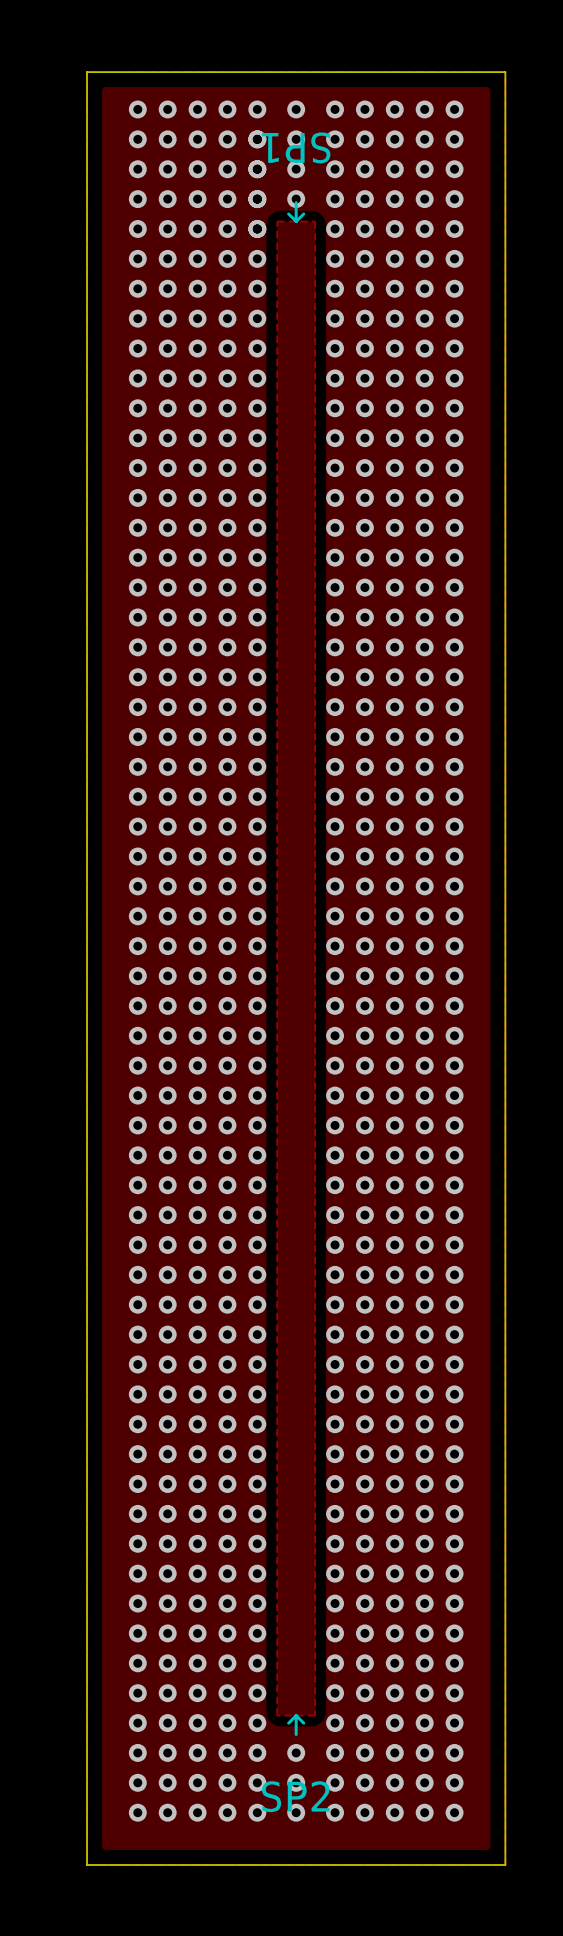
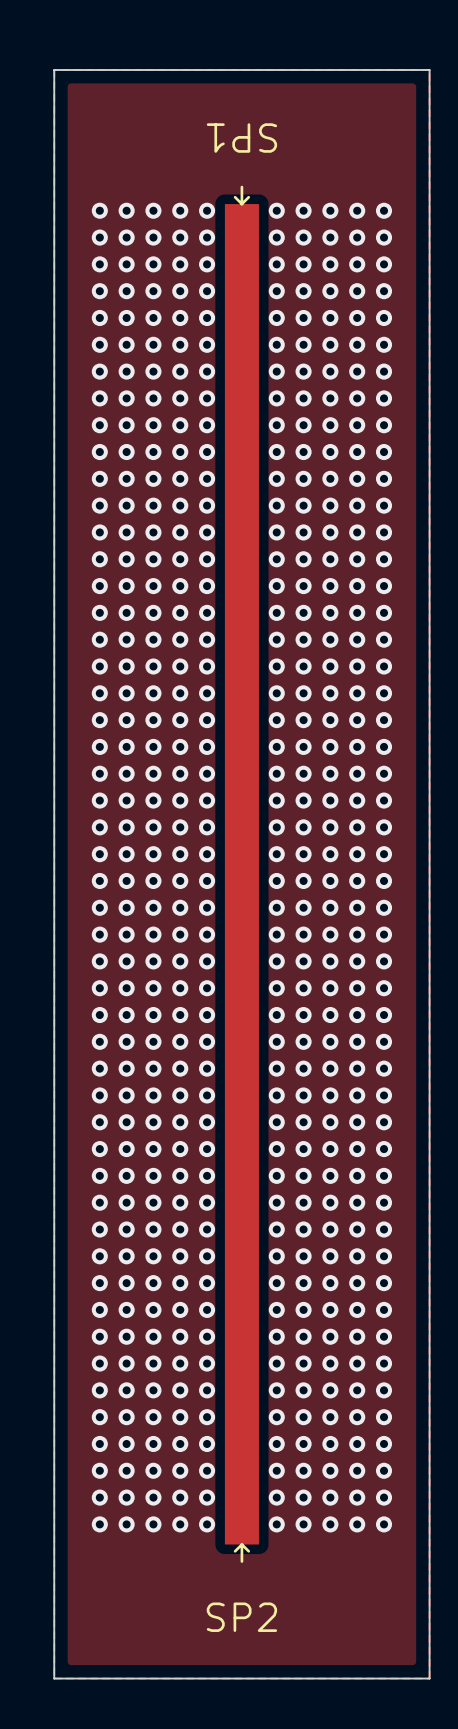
via: (137, 109) -> none
via: (167, 109) -> none
via: (197, 109) -> none
via: (227, 109) -> none
via: (257, 109) -> none
via: (296, 109) -> none
via: (335, 109) -> none
via: (364, 109) -> none
via: (394, 109) -> none
via: (424, 109) -> none
via: (454, 109) -> none
via: (137, 139) -> none
via: (167, 139) -> none
via: (197, 139) -> none
via: (227, 139) -> none
via: (257, 139) -> none
via: (296, 139) -> none
via: (335, 139) -> none
via: (364, 139) -> none
via: (394, 139) -> none
via: (424, 139) -> none
via: (454, 139) -> none
via: (137, 169) -> none
via: (167, 169) -> none
via: (197, 169) -> none
via: (227, 169) -> none
via: (257, 169) -> none
via: (296, 169) -> none
via: (335, 169) -> none
via: (364, 169) -> none
via: (394, 169) -> none
via: (424, 169) -> none
via: (454, 169) -> none
via: (137, 199) -> none
via: (167, 199) -> none
via: (197, 199) -> none
via: (227, 199) -> none
via: (257, 199) -> none
via: (296, 199) -> none
via: (335, 199) -> none
via: (364, 199) -> none
via: (394, 199) -> none
via: (424, 199) -> none
via: (454, 199) -> none
zone outline: (277, 221) (315, 221) (315, 1715) (277, 1715) (277, 221) -> none
drawing: none -> [224, 204, 259, 1545]
via: (137, 1723) -> none
via: (167, 1723) -> none
via: (197, 1723) -> none
via: (227, 1723) -> none
via: (257, 1723) -> none
via: (335, 1723) -> none
via: (364, 1723) -> none
via: (394, 1723) -> none
via: (424, 1723) -> none
via: (454, 1723) -> none
via: (137, 1752) -> none
via: (167, 1752) -> none
via: (197, 1752) -> none
via: (227, 1752) -> none
via: (257, 1752) -> none
via: (296, 1752) -> none
via: (335, 1752) -> none
via: (364, 1752) -> none
via: (394, 1752) -> none
via: (424, 1752) -> none
via: (454, 1752) -> none
via: (137, 1782) -> none
via: (167, 1782) -> none
via: (197, 1782) -> none
via: (227, 1782) -> none
via: (257, 1782) -> none
via: (296, 1782) -> none
via: (335, 1782) -> none
via: (364, 1782) -> none
via: (394, 1782) -> none
via: (424, 1782) -> none
via: (454, 1782) -> none
via: (137, 1812) -> none
via: (167, 1812) -> none
via: (197, 1812) -> none
via: (227, 1812) -> none
via: (257, 1812) -> none
via: (296, 1812) -> none
via: (335, 1812) -> none
via: (364, 1812) -> none
via: (394, 1812) -> none
via: (424, 1812) -> none
via: (454, 1812) -> none

